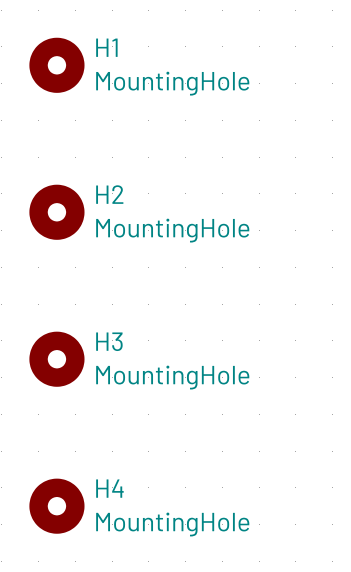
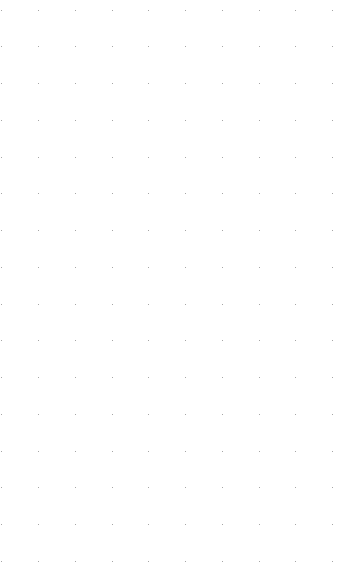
H1: MountingHole (56, 65) -> none
H2: MountingHole (56, 212) -> none
H3: MountingHole (56, 359) -> none
H4: MountingHole (56, 506) -> none

